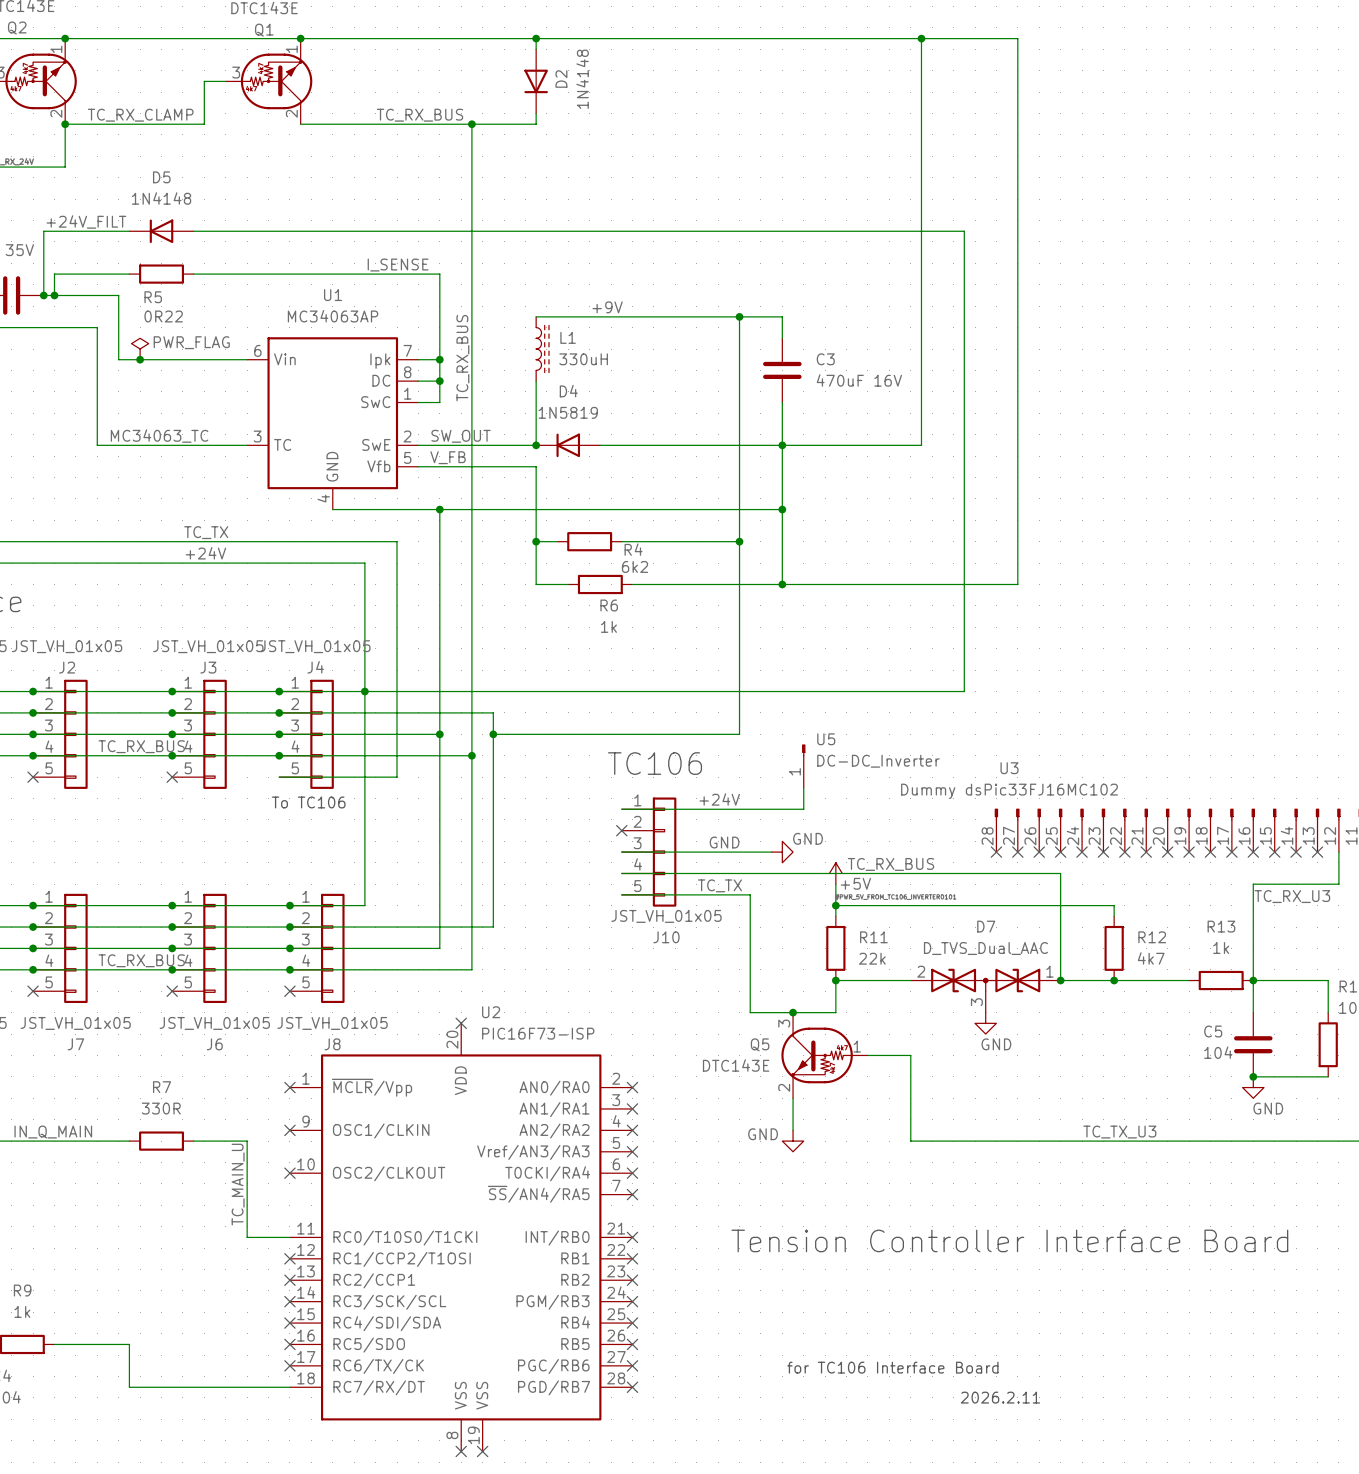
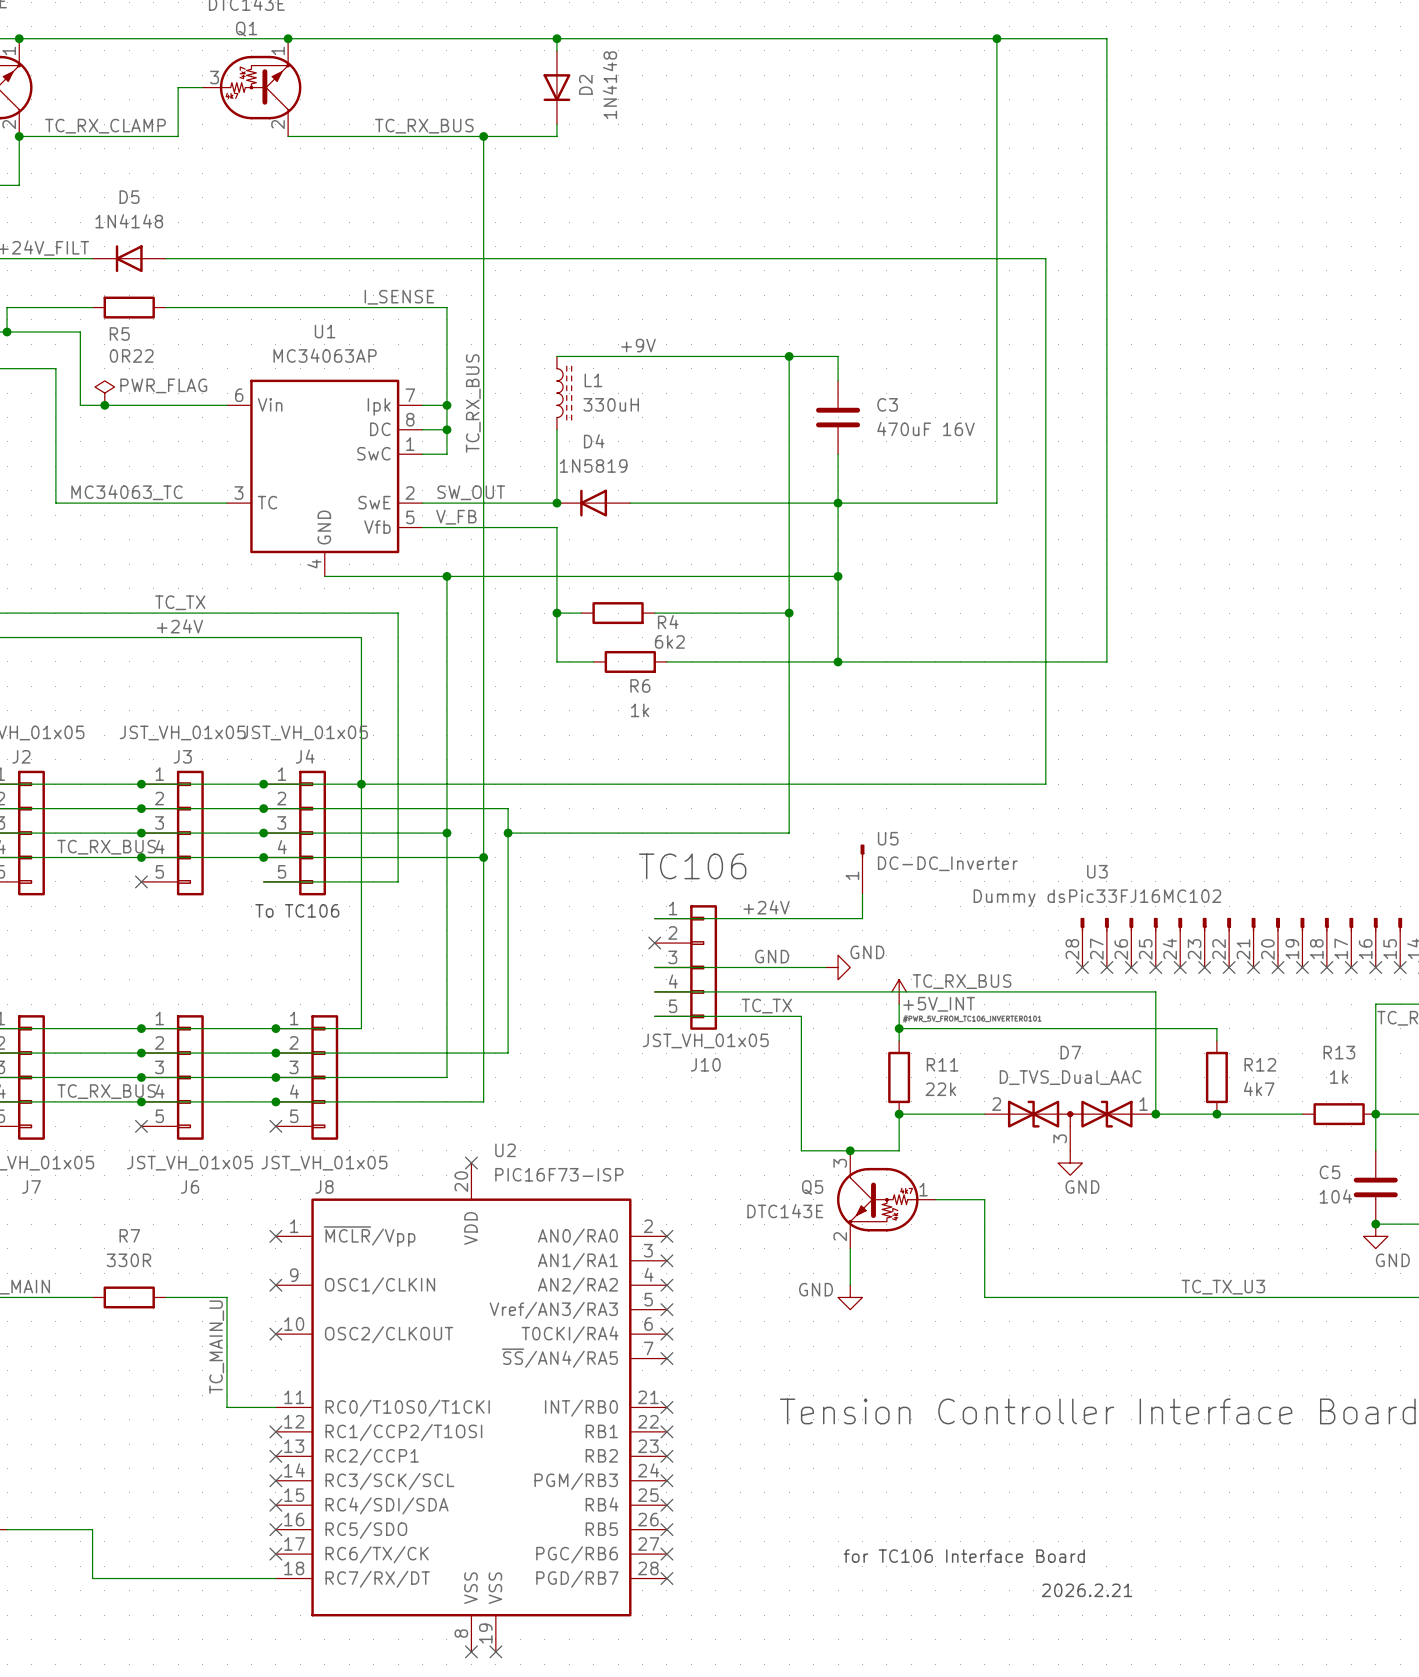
power symbol: +5V (835, 873) -> +5V_INT (899, 991)
text: 2026.2.11 (1000, 1397) -> 2026.2.21 (1087, 1590)

